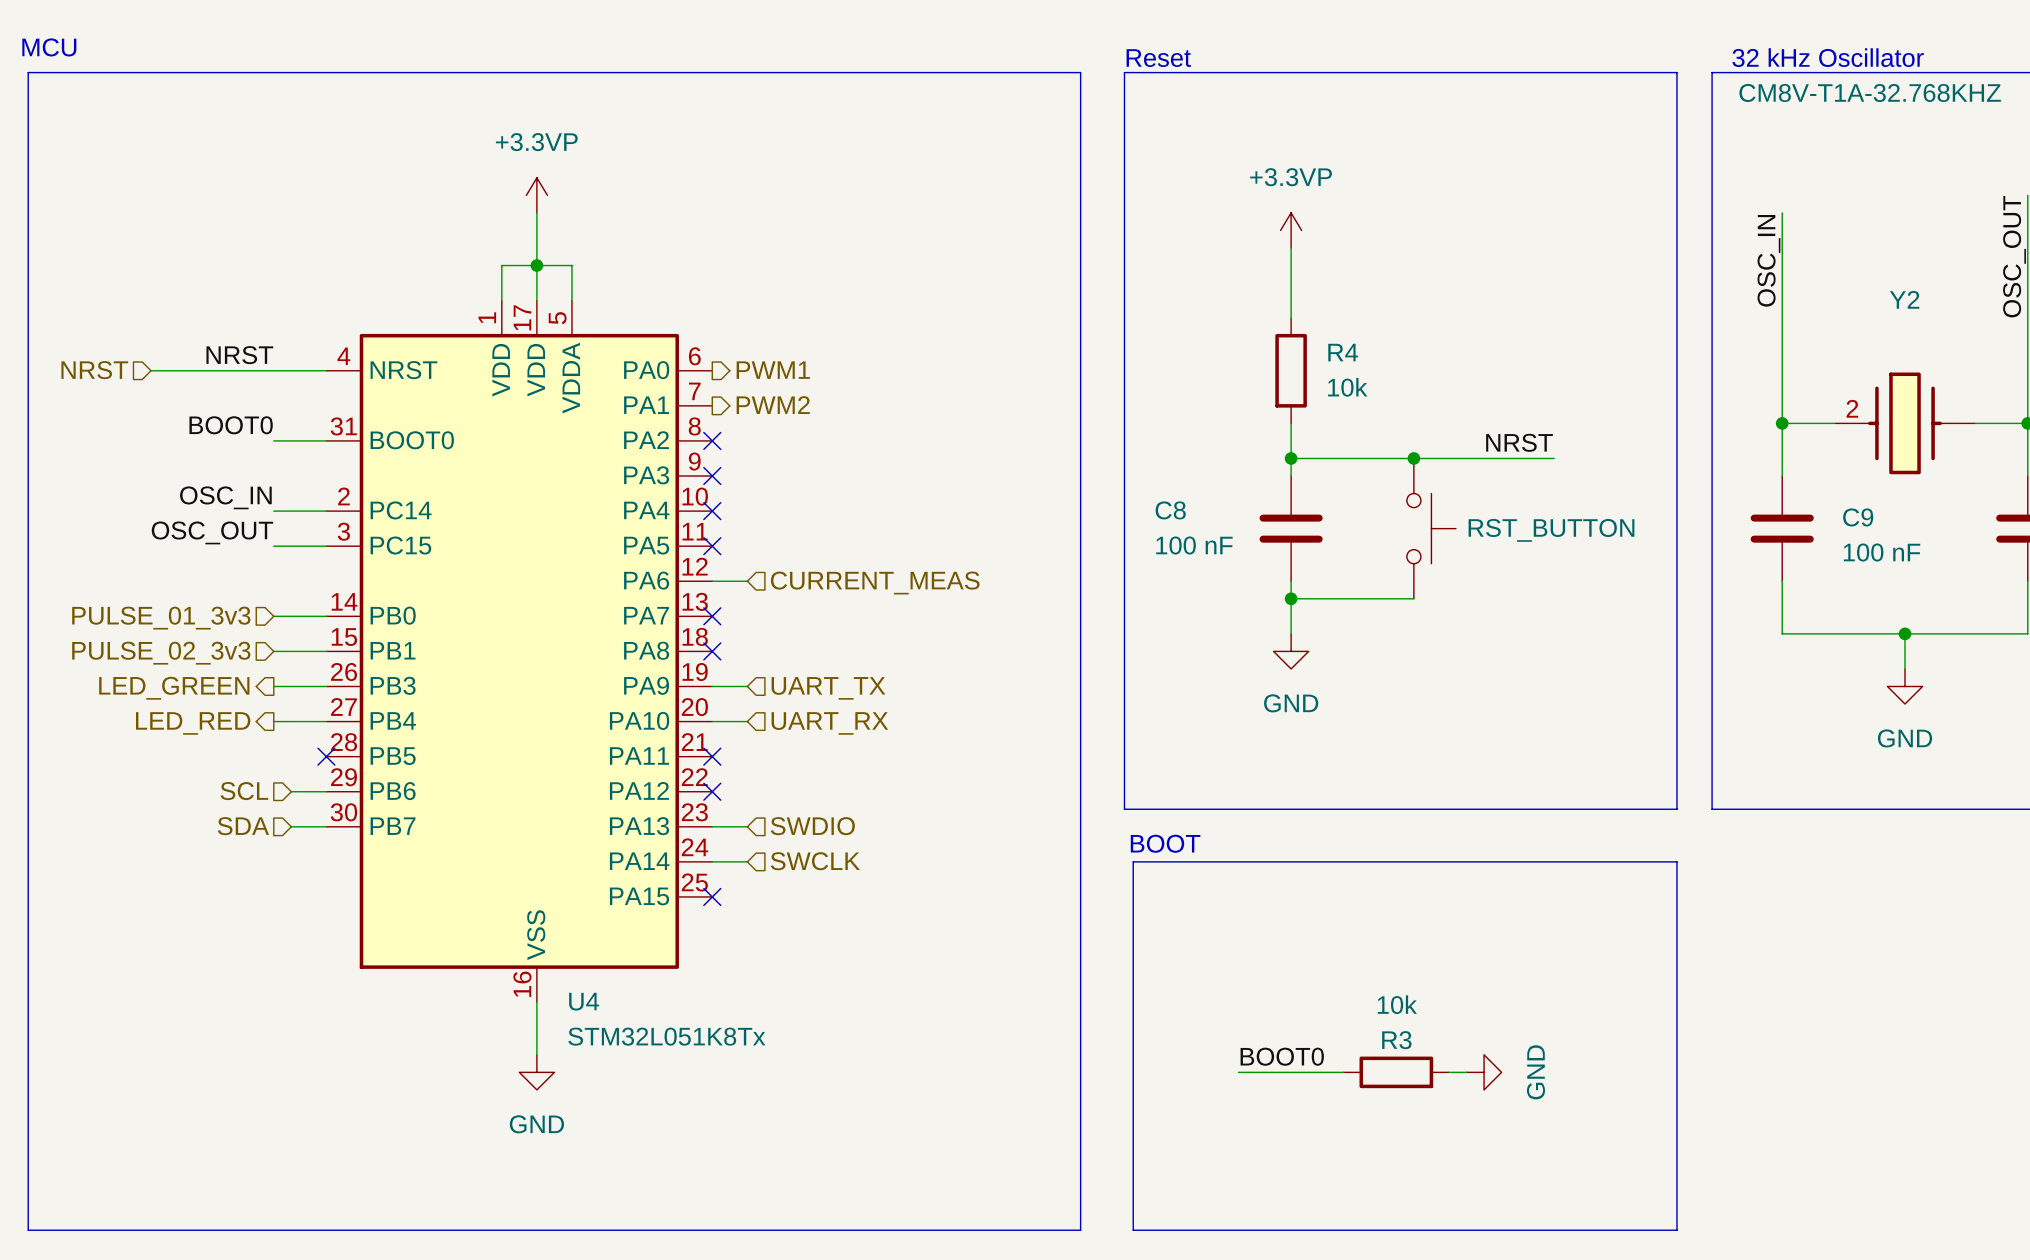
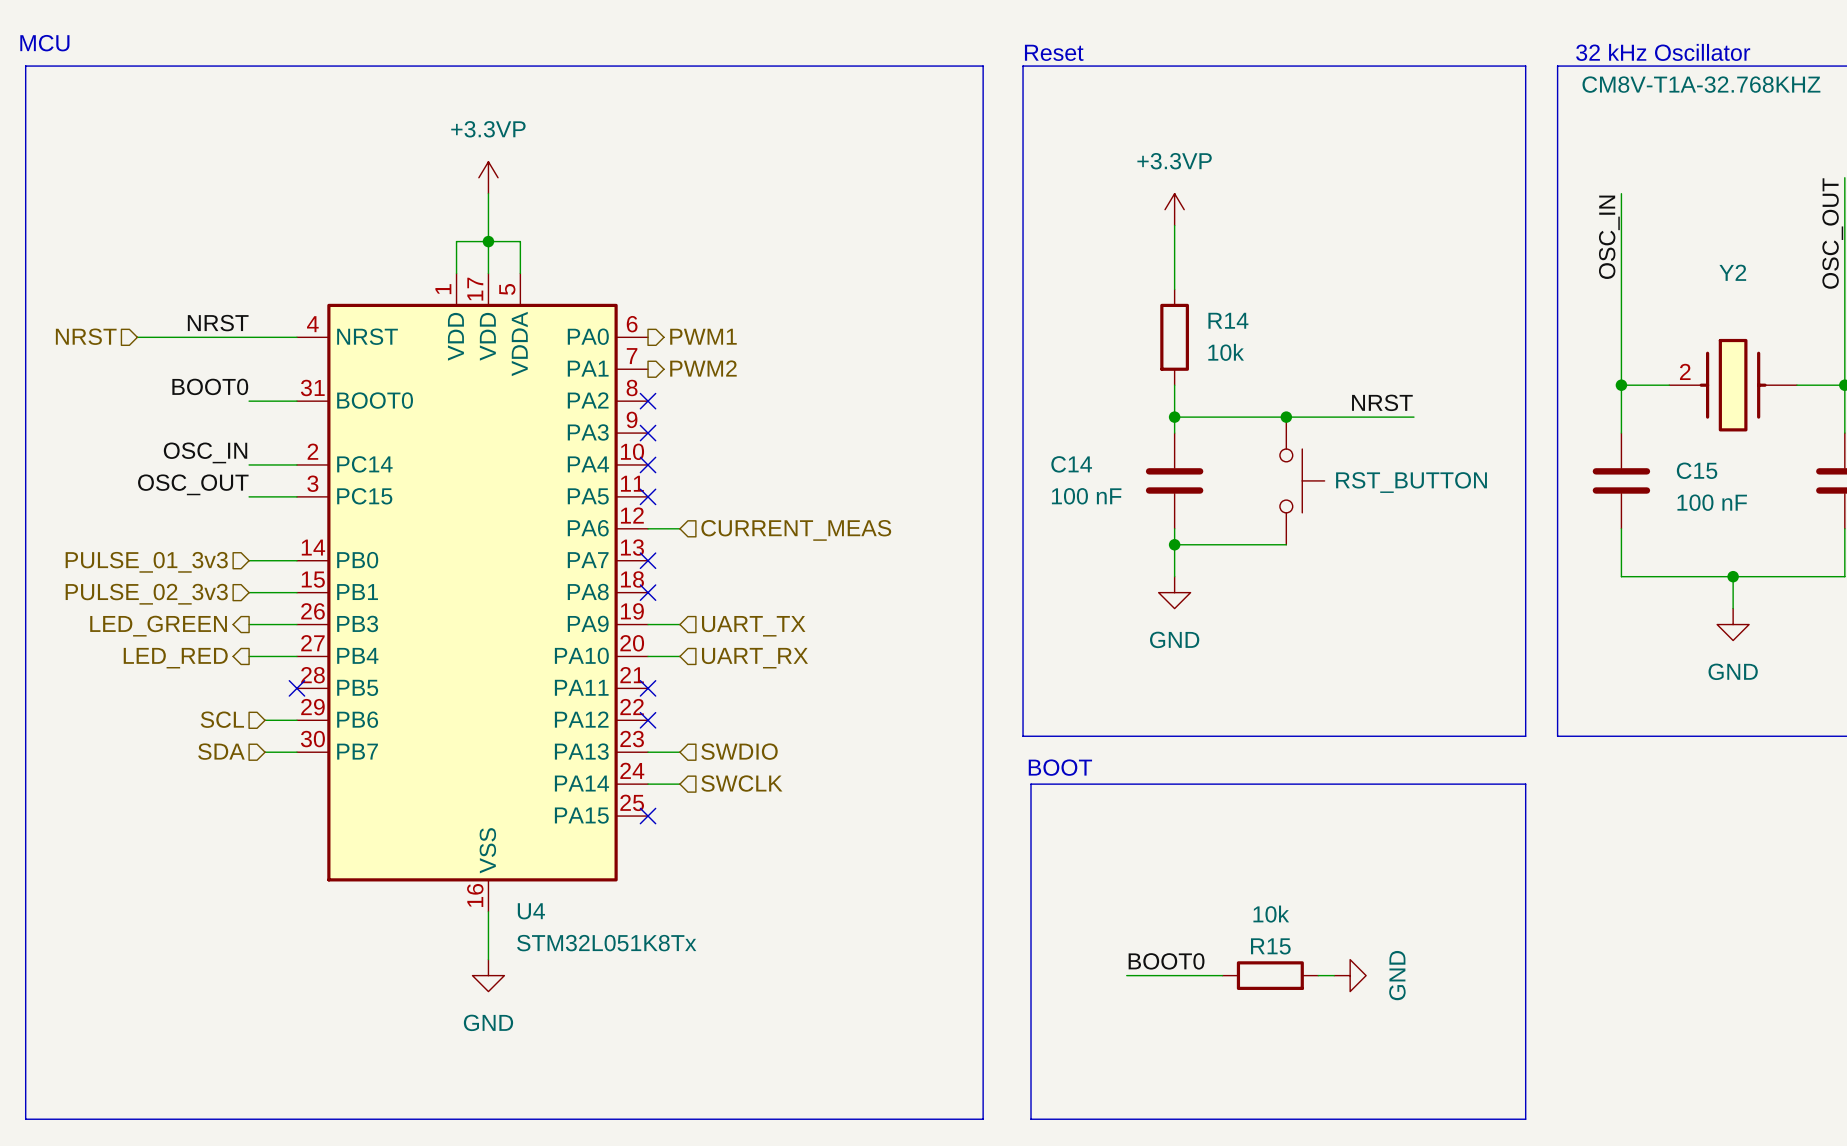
R4 name: R4 (1343, 352) -> R14 (1228, 320)
C8 name: C8 (1170, 510) -> C14 (1071, 464)
C9 name: C9 (1858, 517) -> C15 (1697, 470)
R3 name: R3 (1396, 1040) -> R15 (1270, 946)

